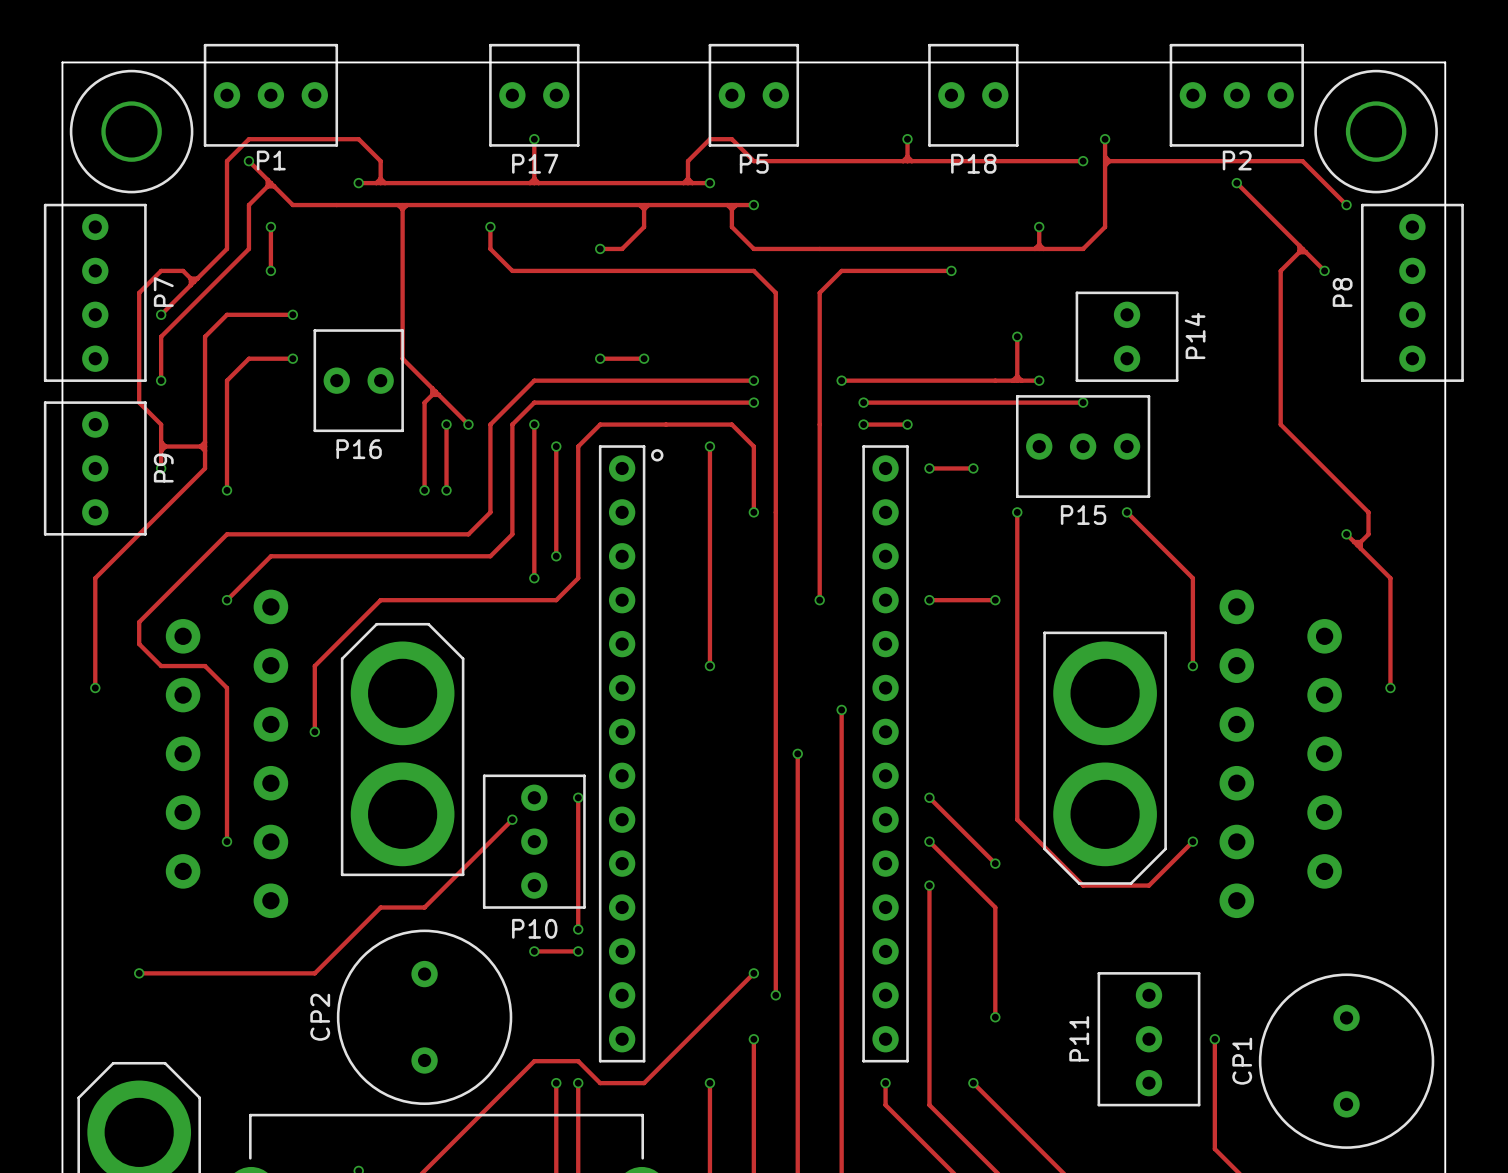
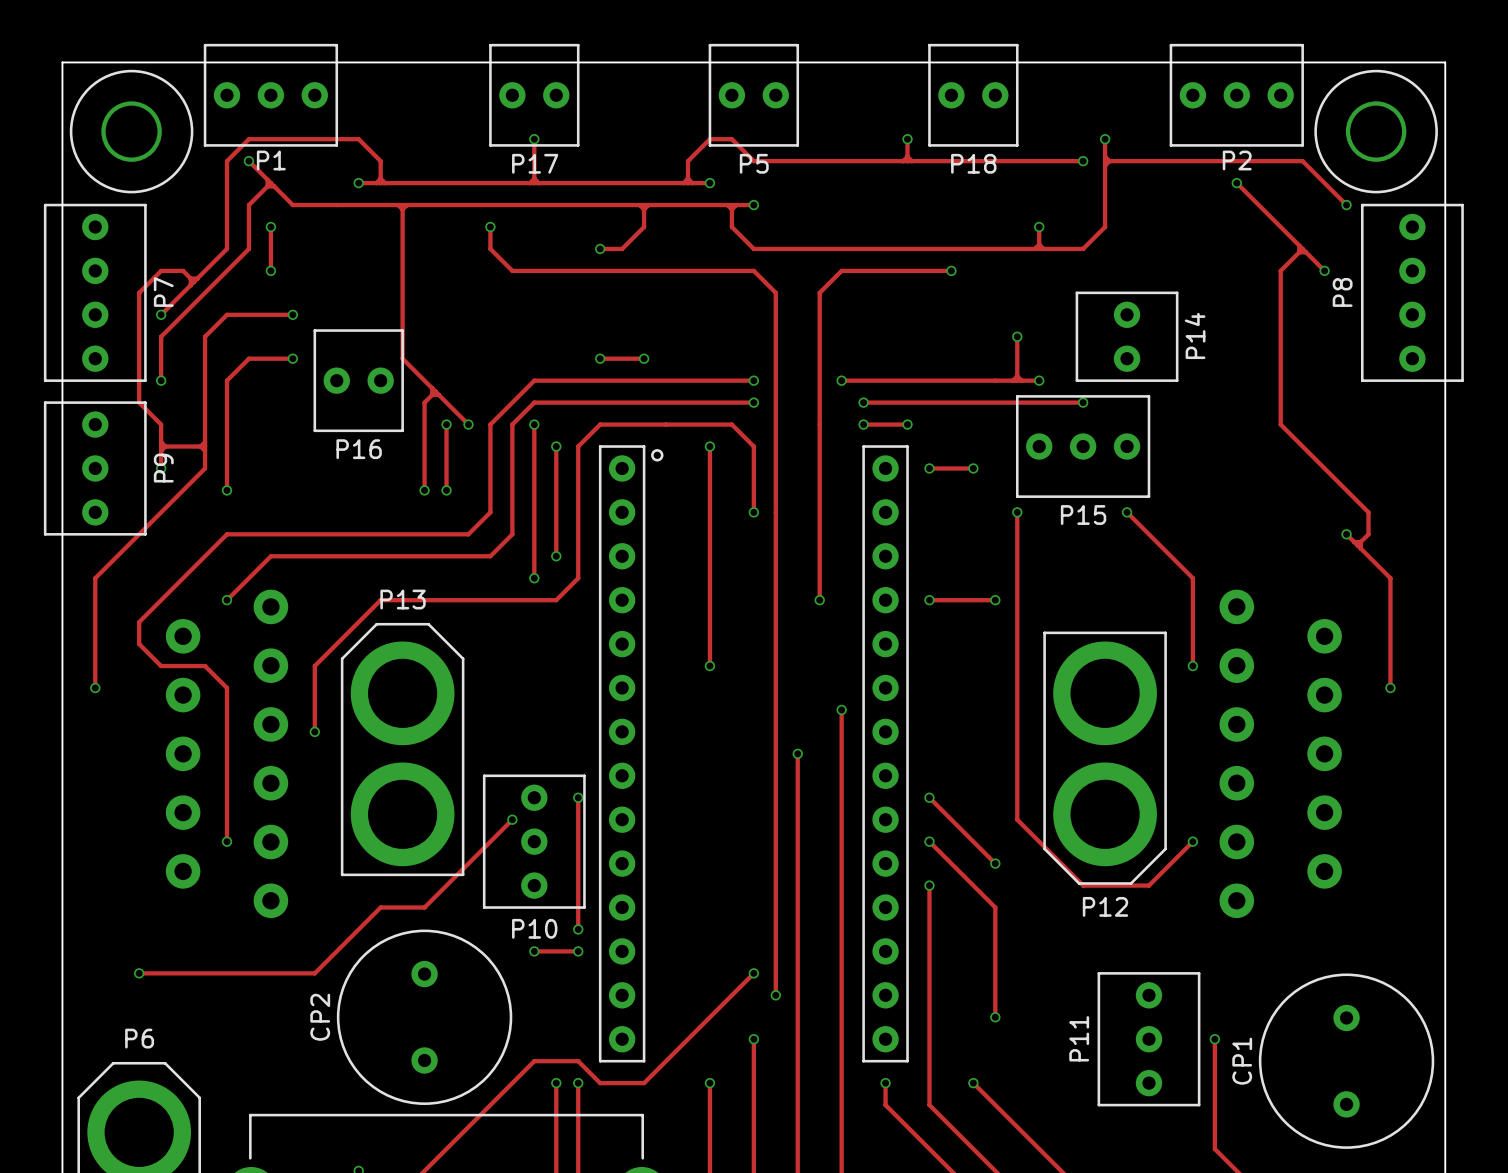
P13 name: none -> P13 (403, 599)
P12 name: none -> P12 (1105, 906)
P6 name: none -> P6 (139, 1038)

